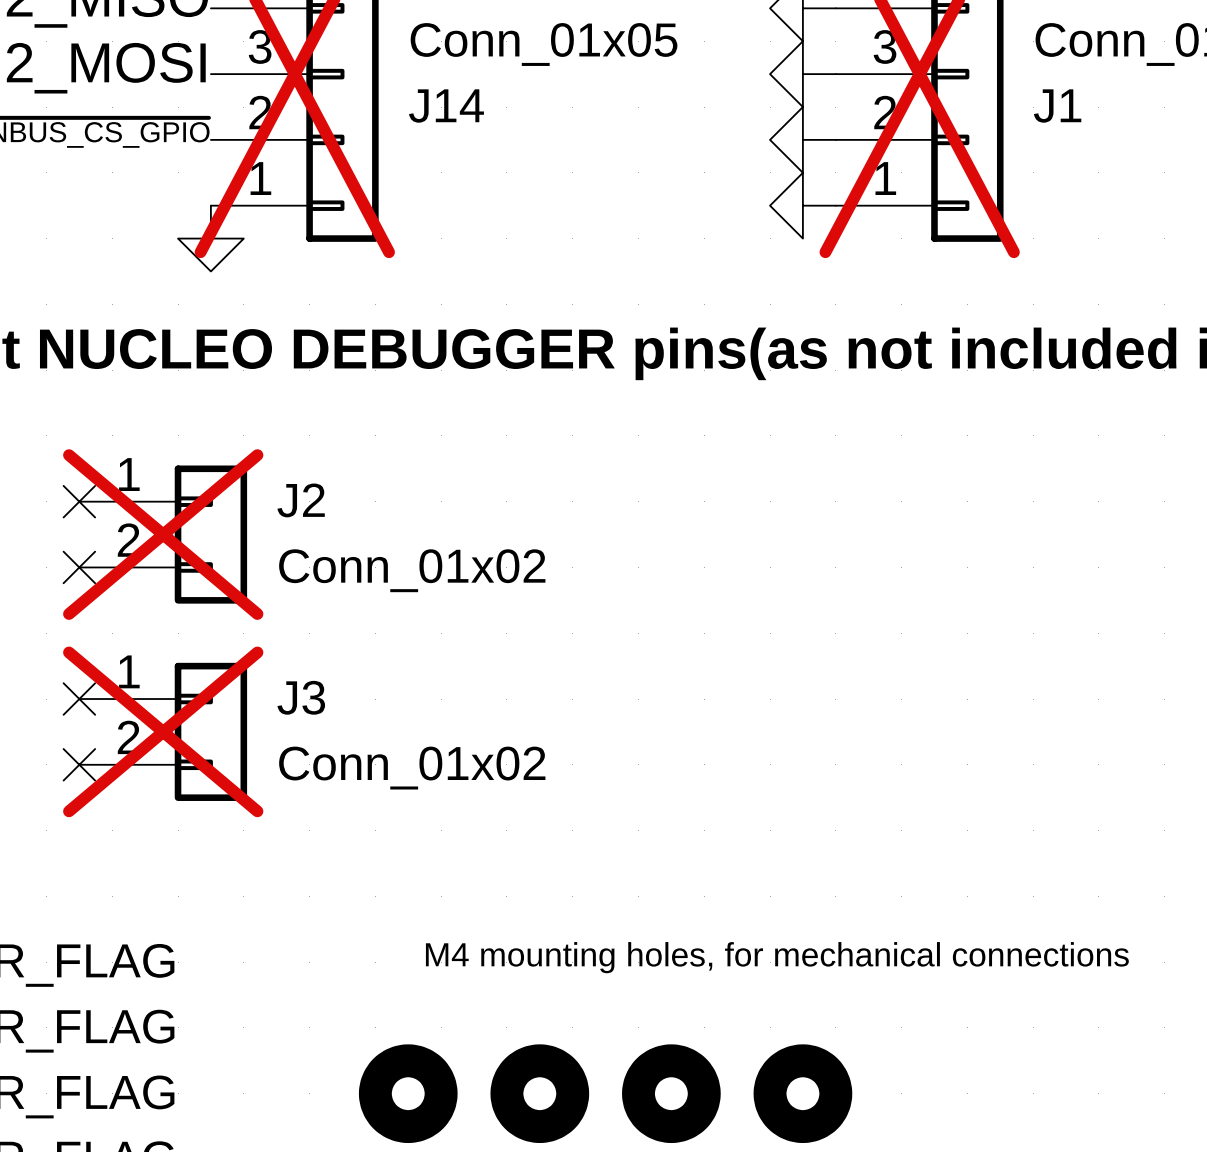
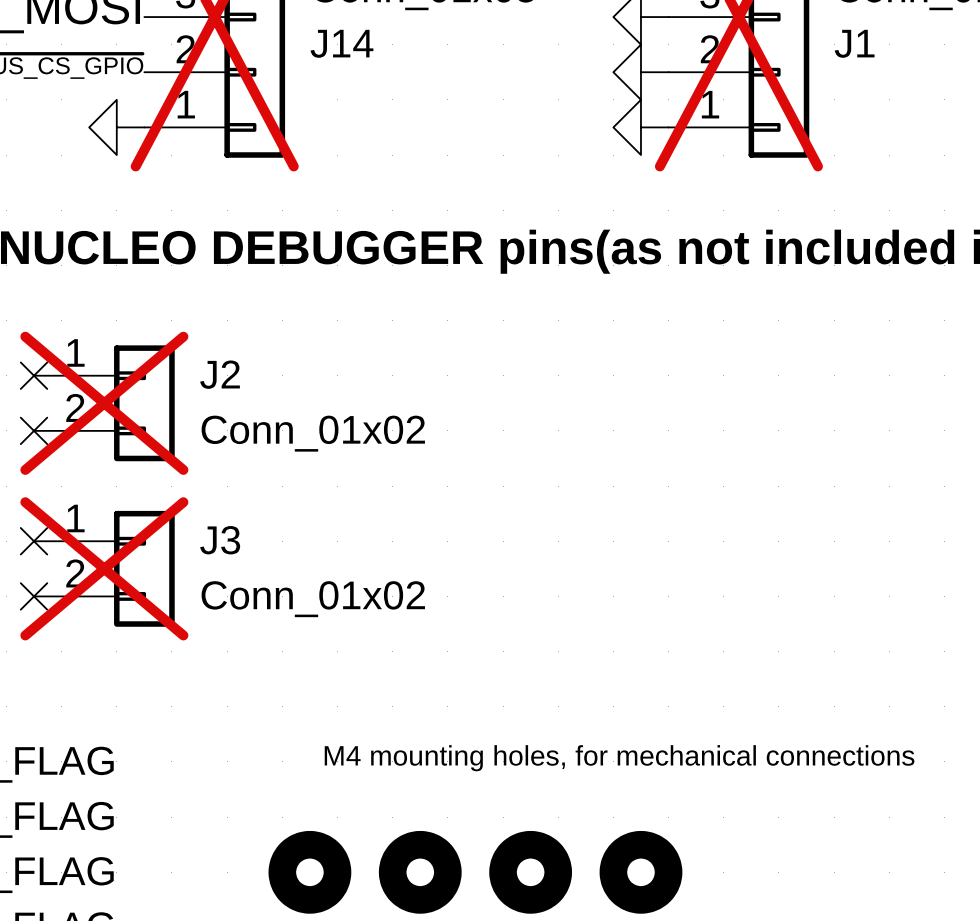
power symbol rotation: 0° (210, 238) -> 90° clockwise (116, 127)
power symbol position: (210, 238) -> (116, 127)

